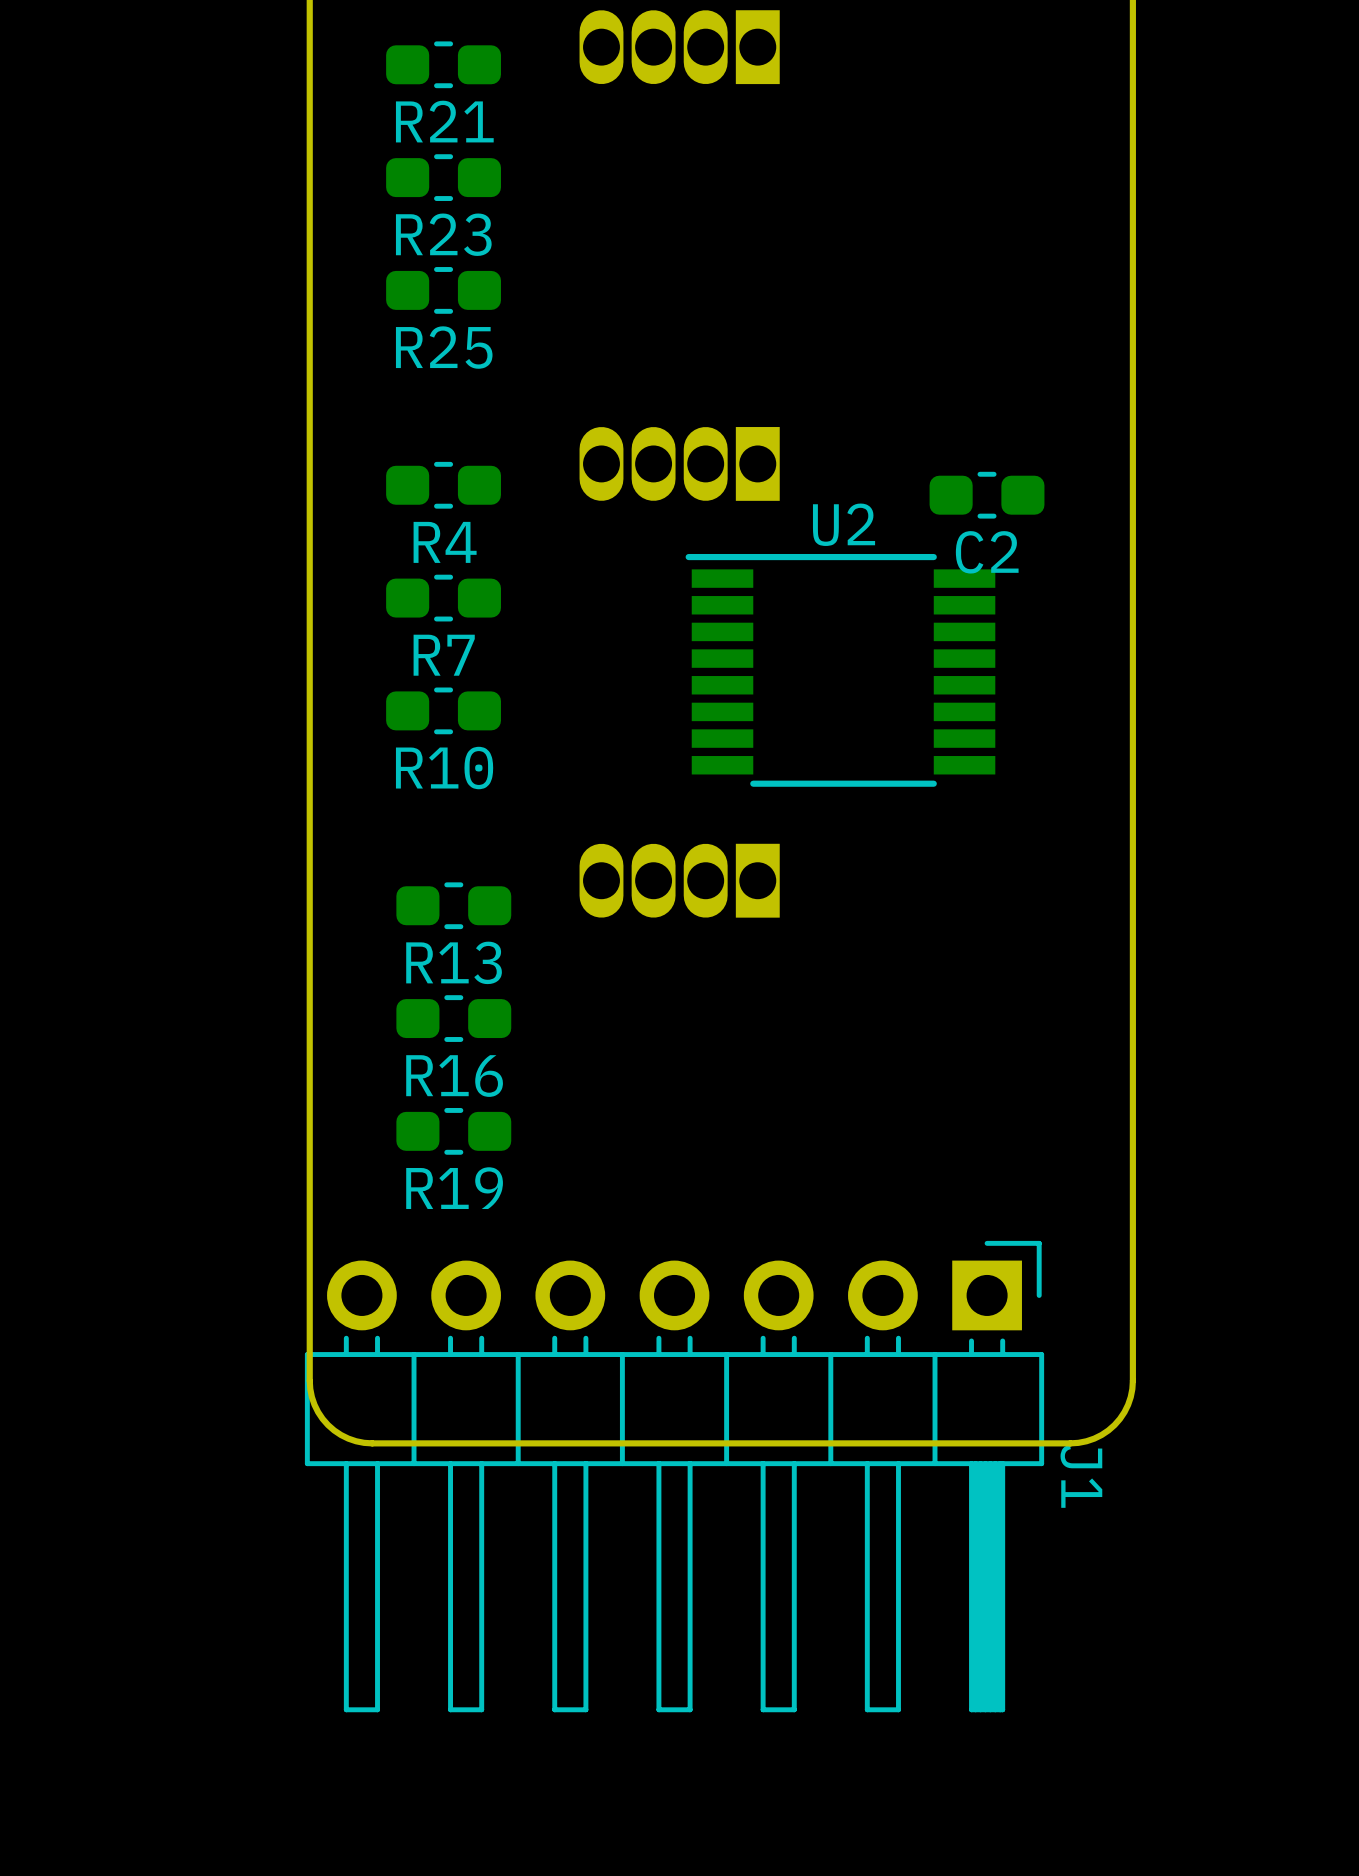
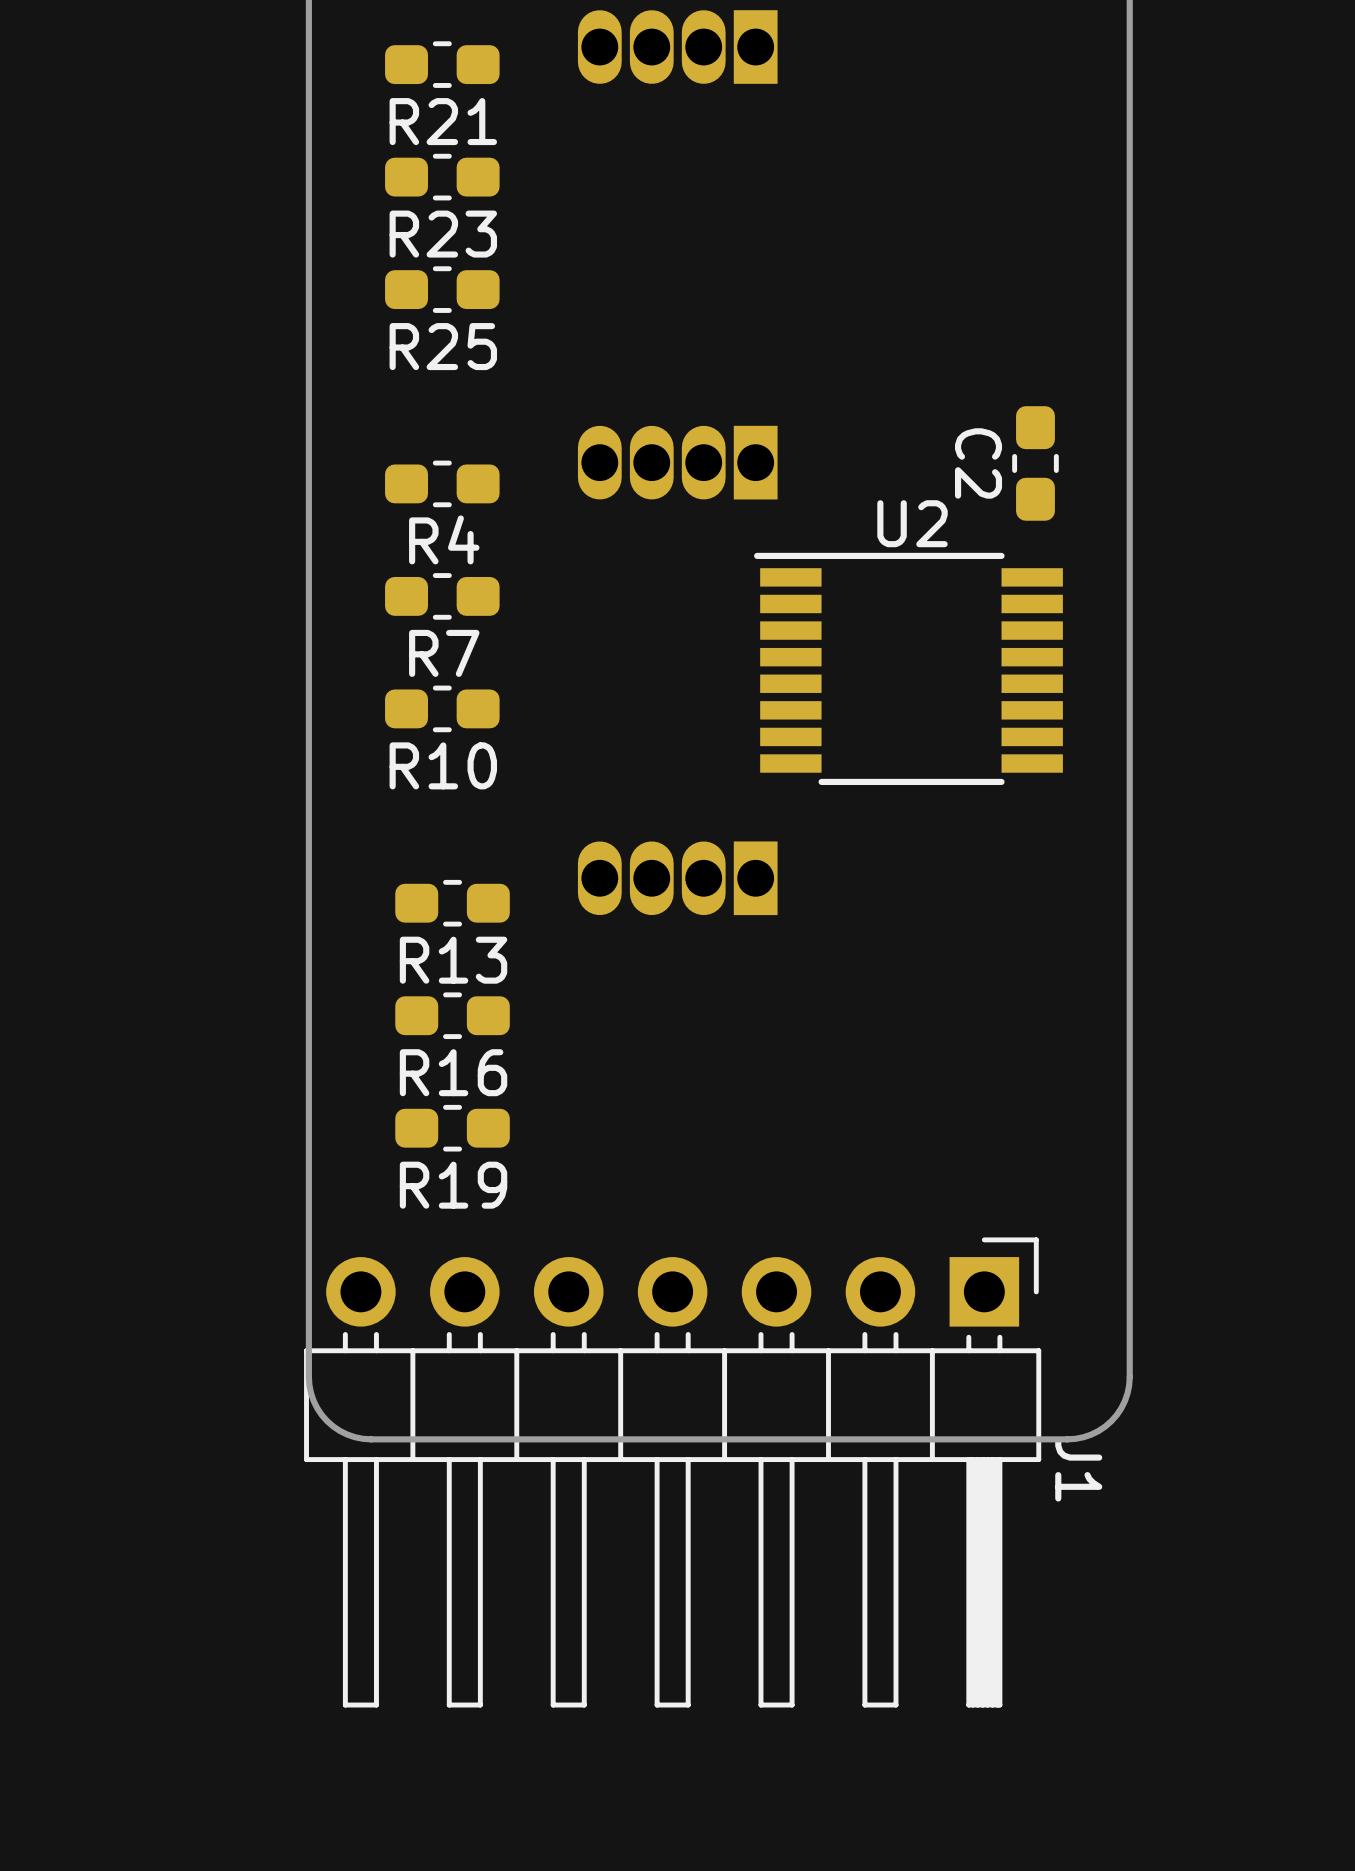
C2 rotation: 0° (987, 495) -> 90° clockwise (1035, 463)
U2 position: (840, 670) -> (908, 668)

